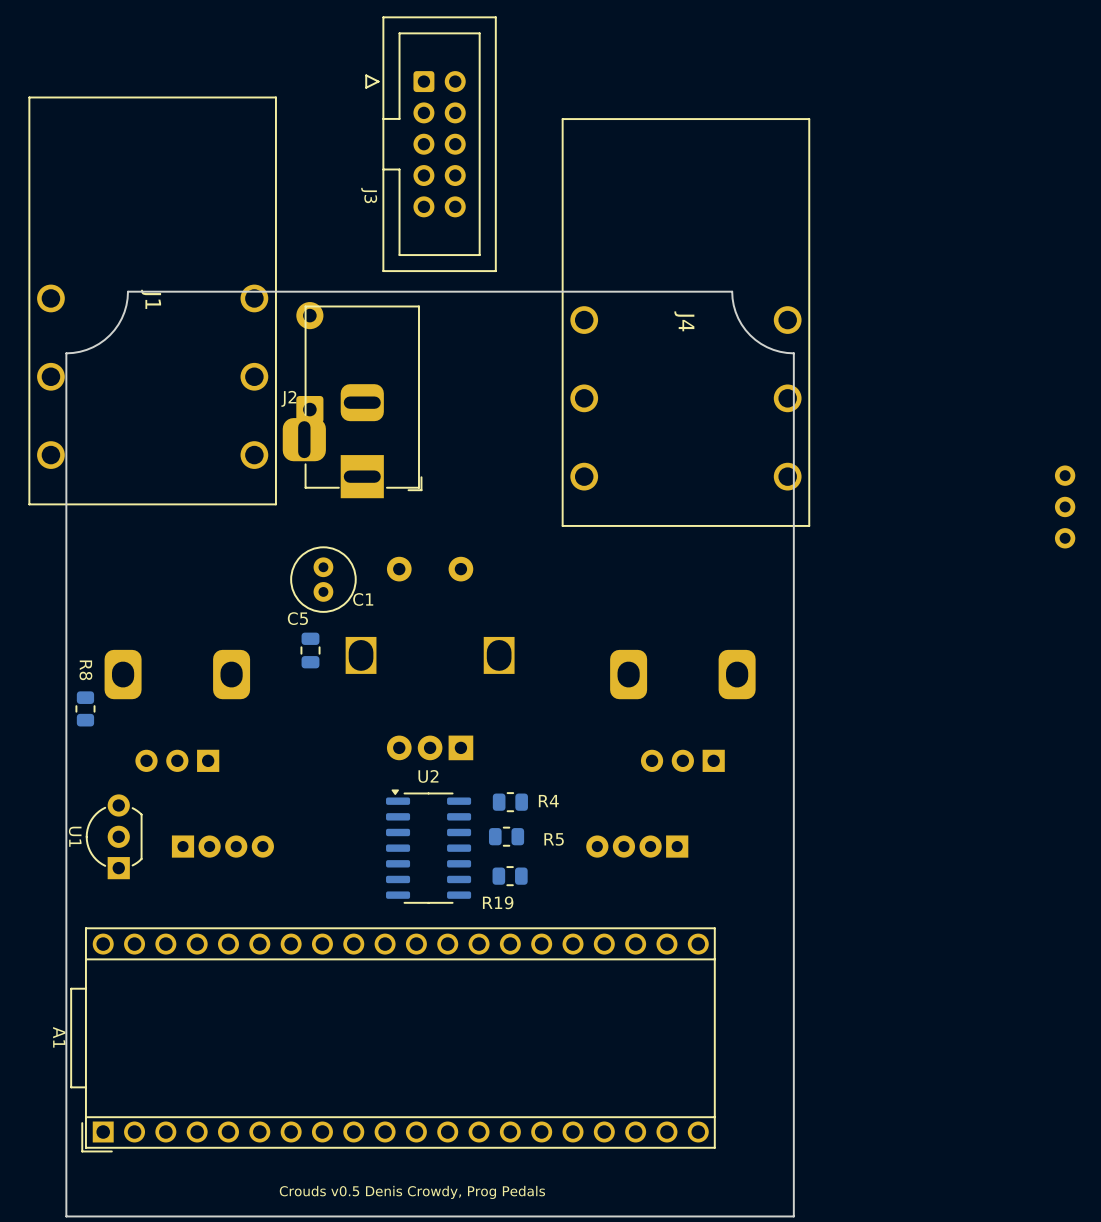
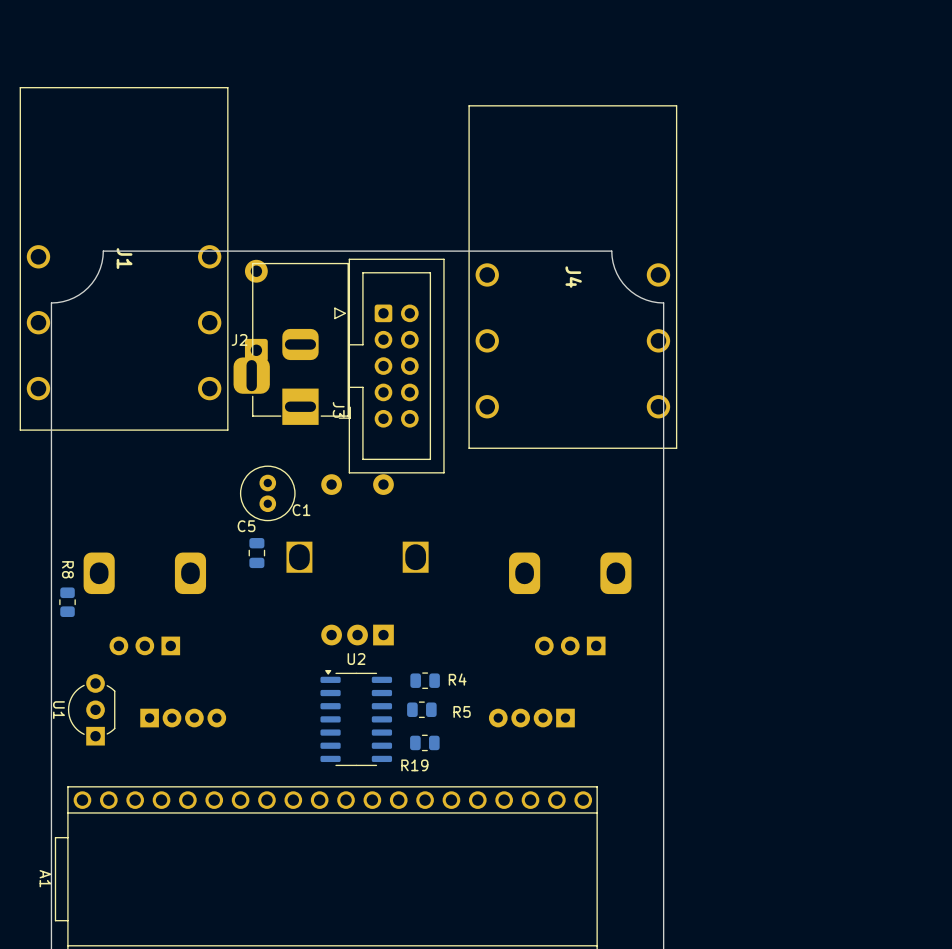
J3 position: (431, 144) -> (389, 366)
part: (1065, 506) -> none

